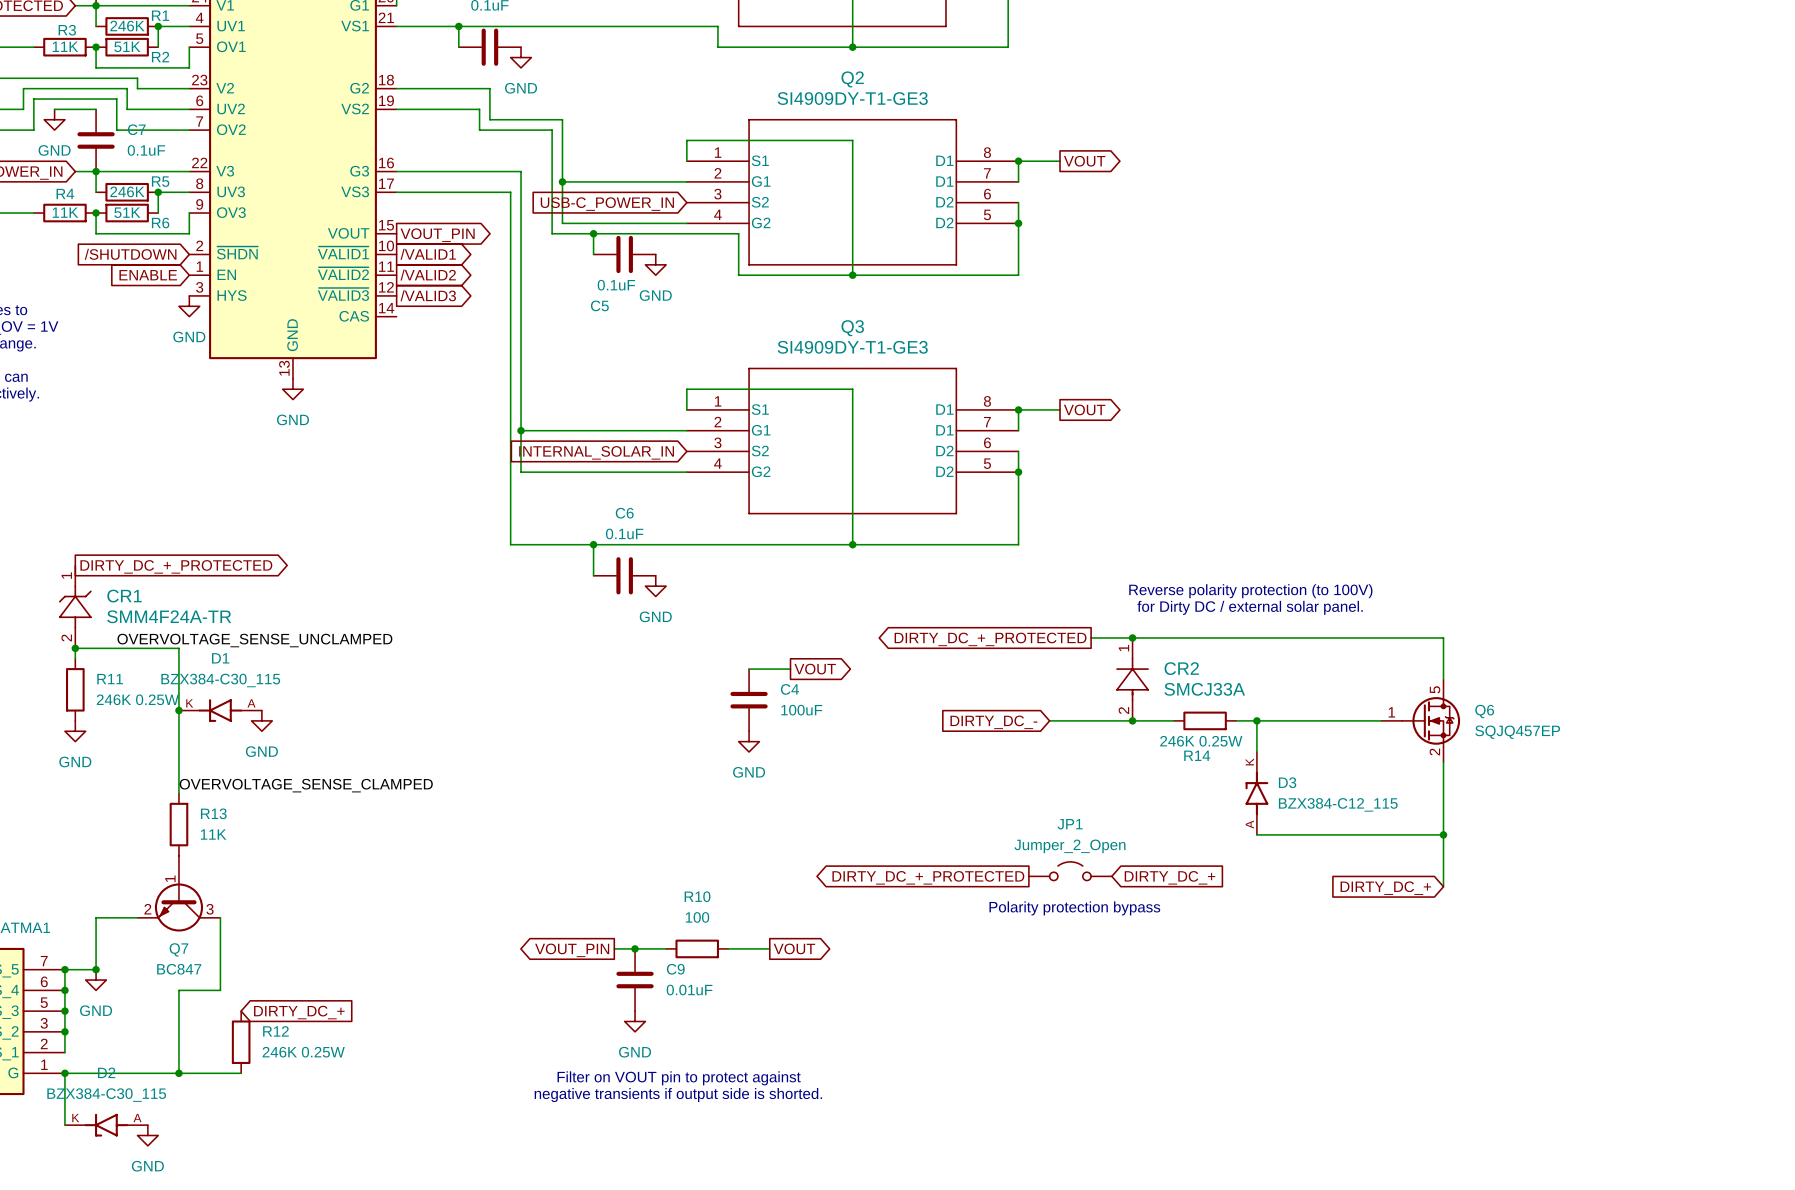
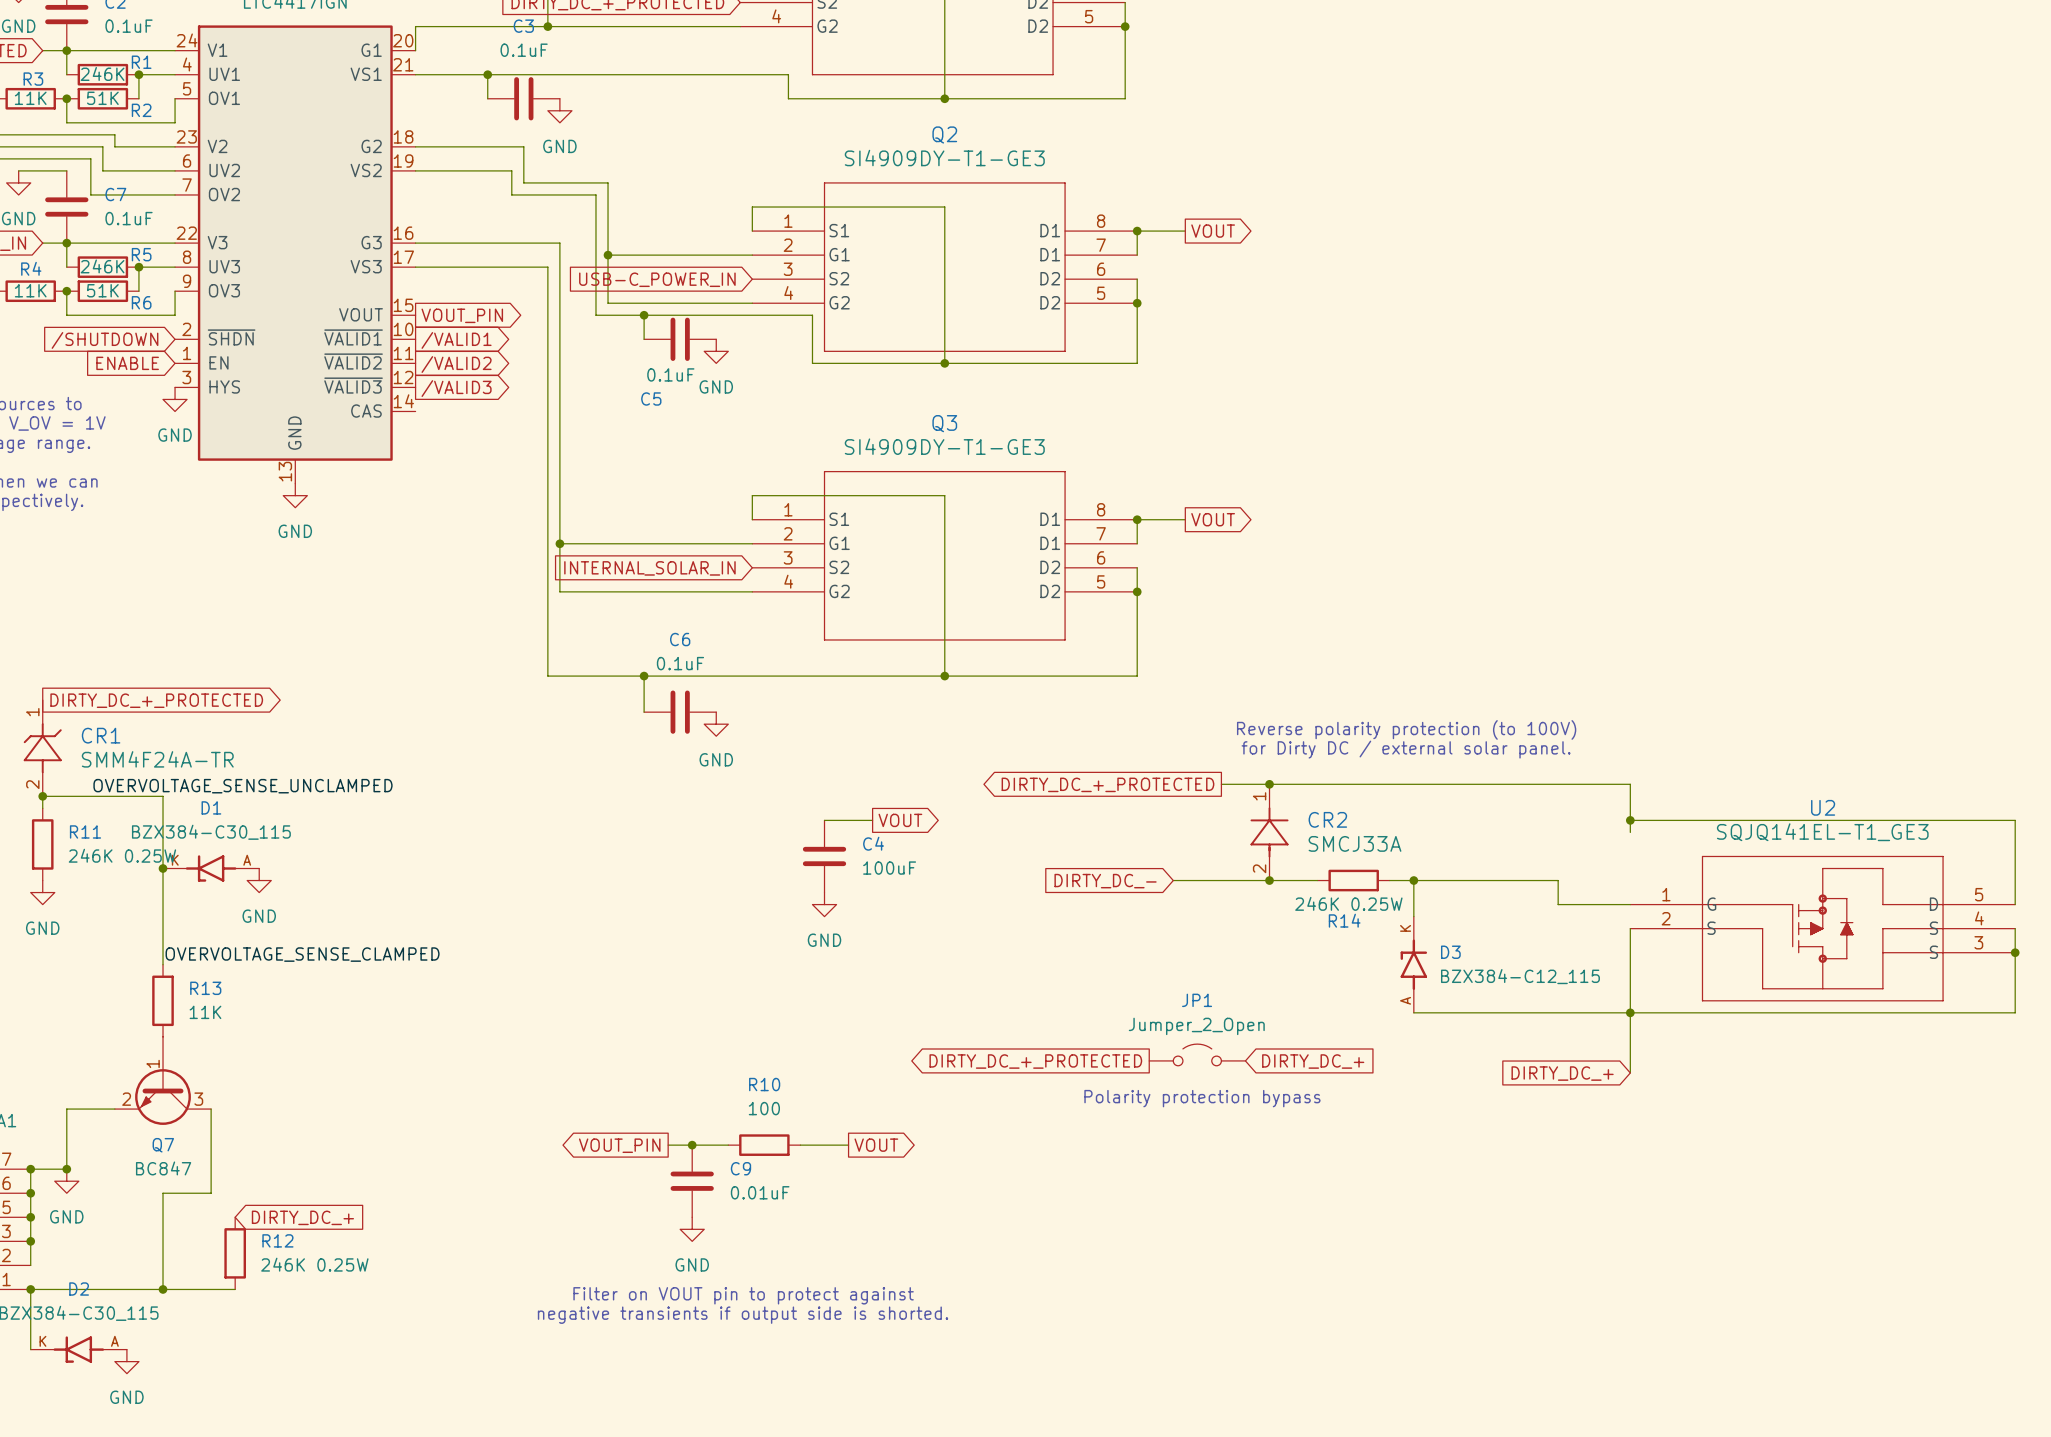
wire: none -> (1630, 820) (2015, 820) (2015, 904)
junction: none -> (1630, 820)
wire: none -> (1558, 880) (1558, 904) (1630, 904)
Q6: SQJQ457EP (1420, 720) -> none
U2: none -> SQJQ141EL-T1_GE3 (1822, 928)
wire: none -> (2015, 928) (2015, 1012) (1630, 1012)
junction: none -> (2015, 952)

